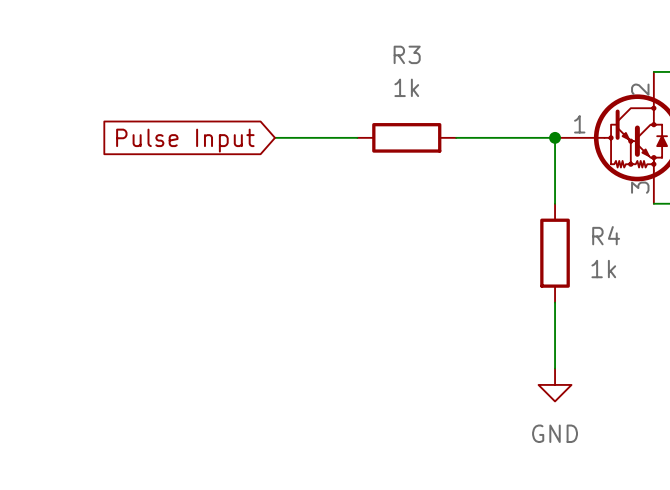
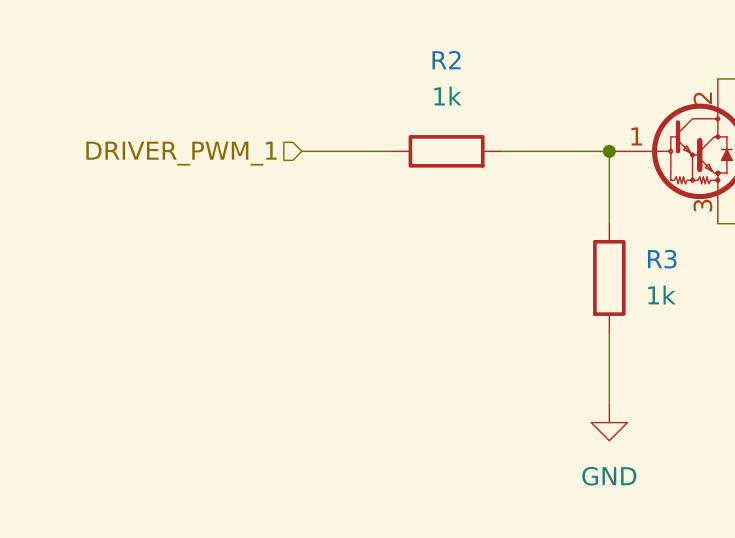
R3 name: R3 (407, 54) -> R2 (446, 60)
hierarchical label: none -> DRIVER_PWM_1 (181, 153)
global label: Pulse Input (185, 140) -> none
R4 name: R4 (606, 235) -> R3 (662, 259)

